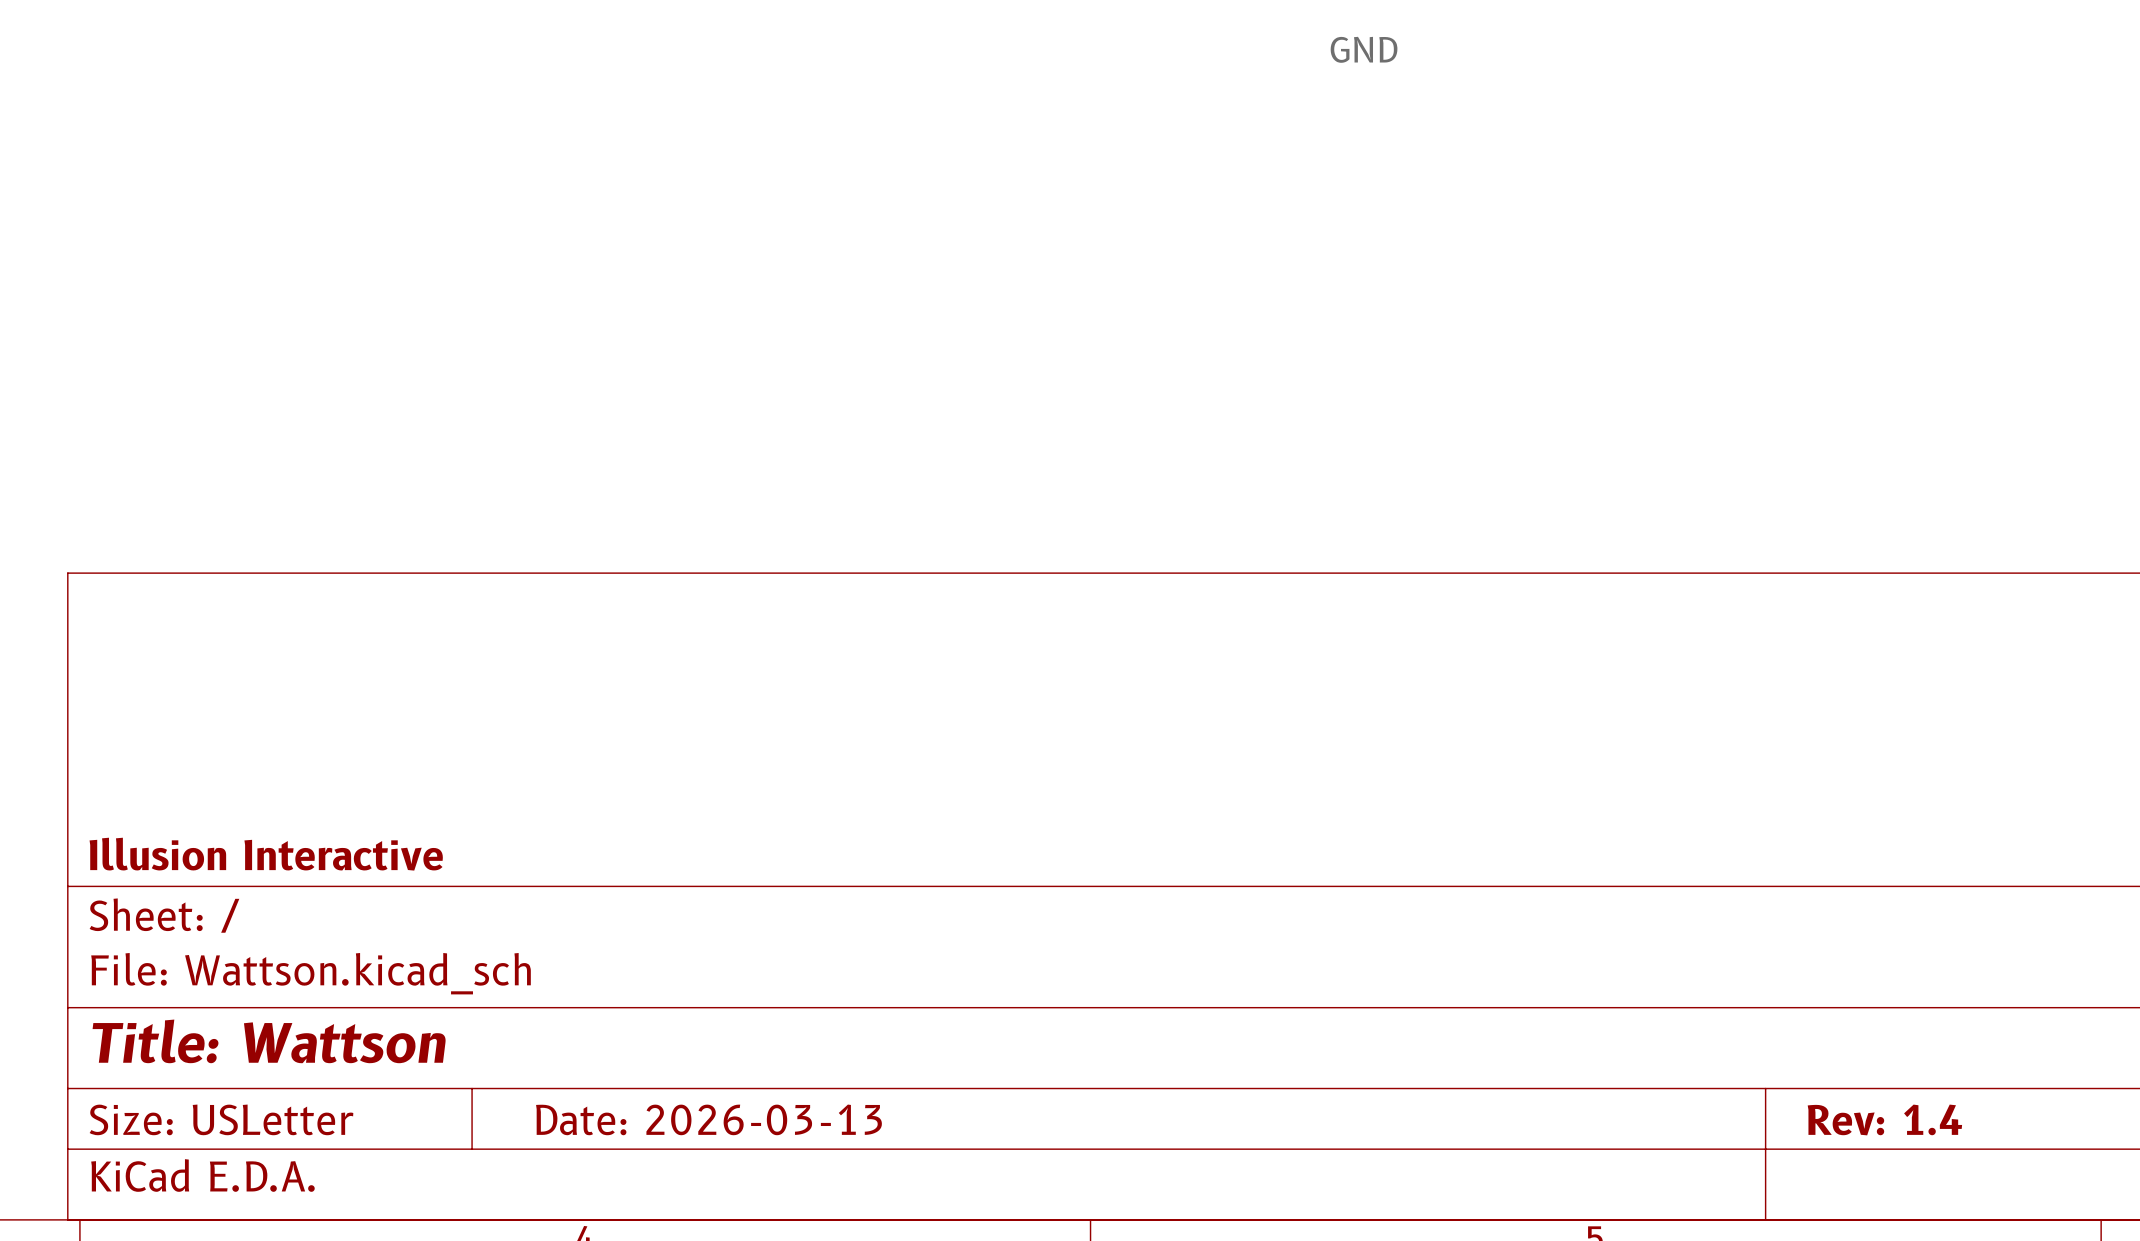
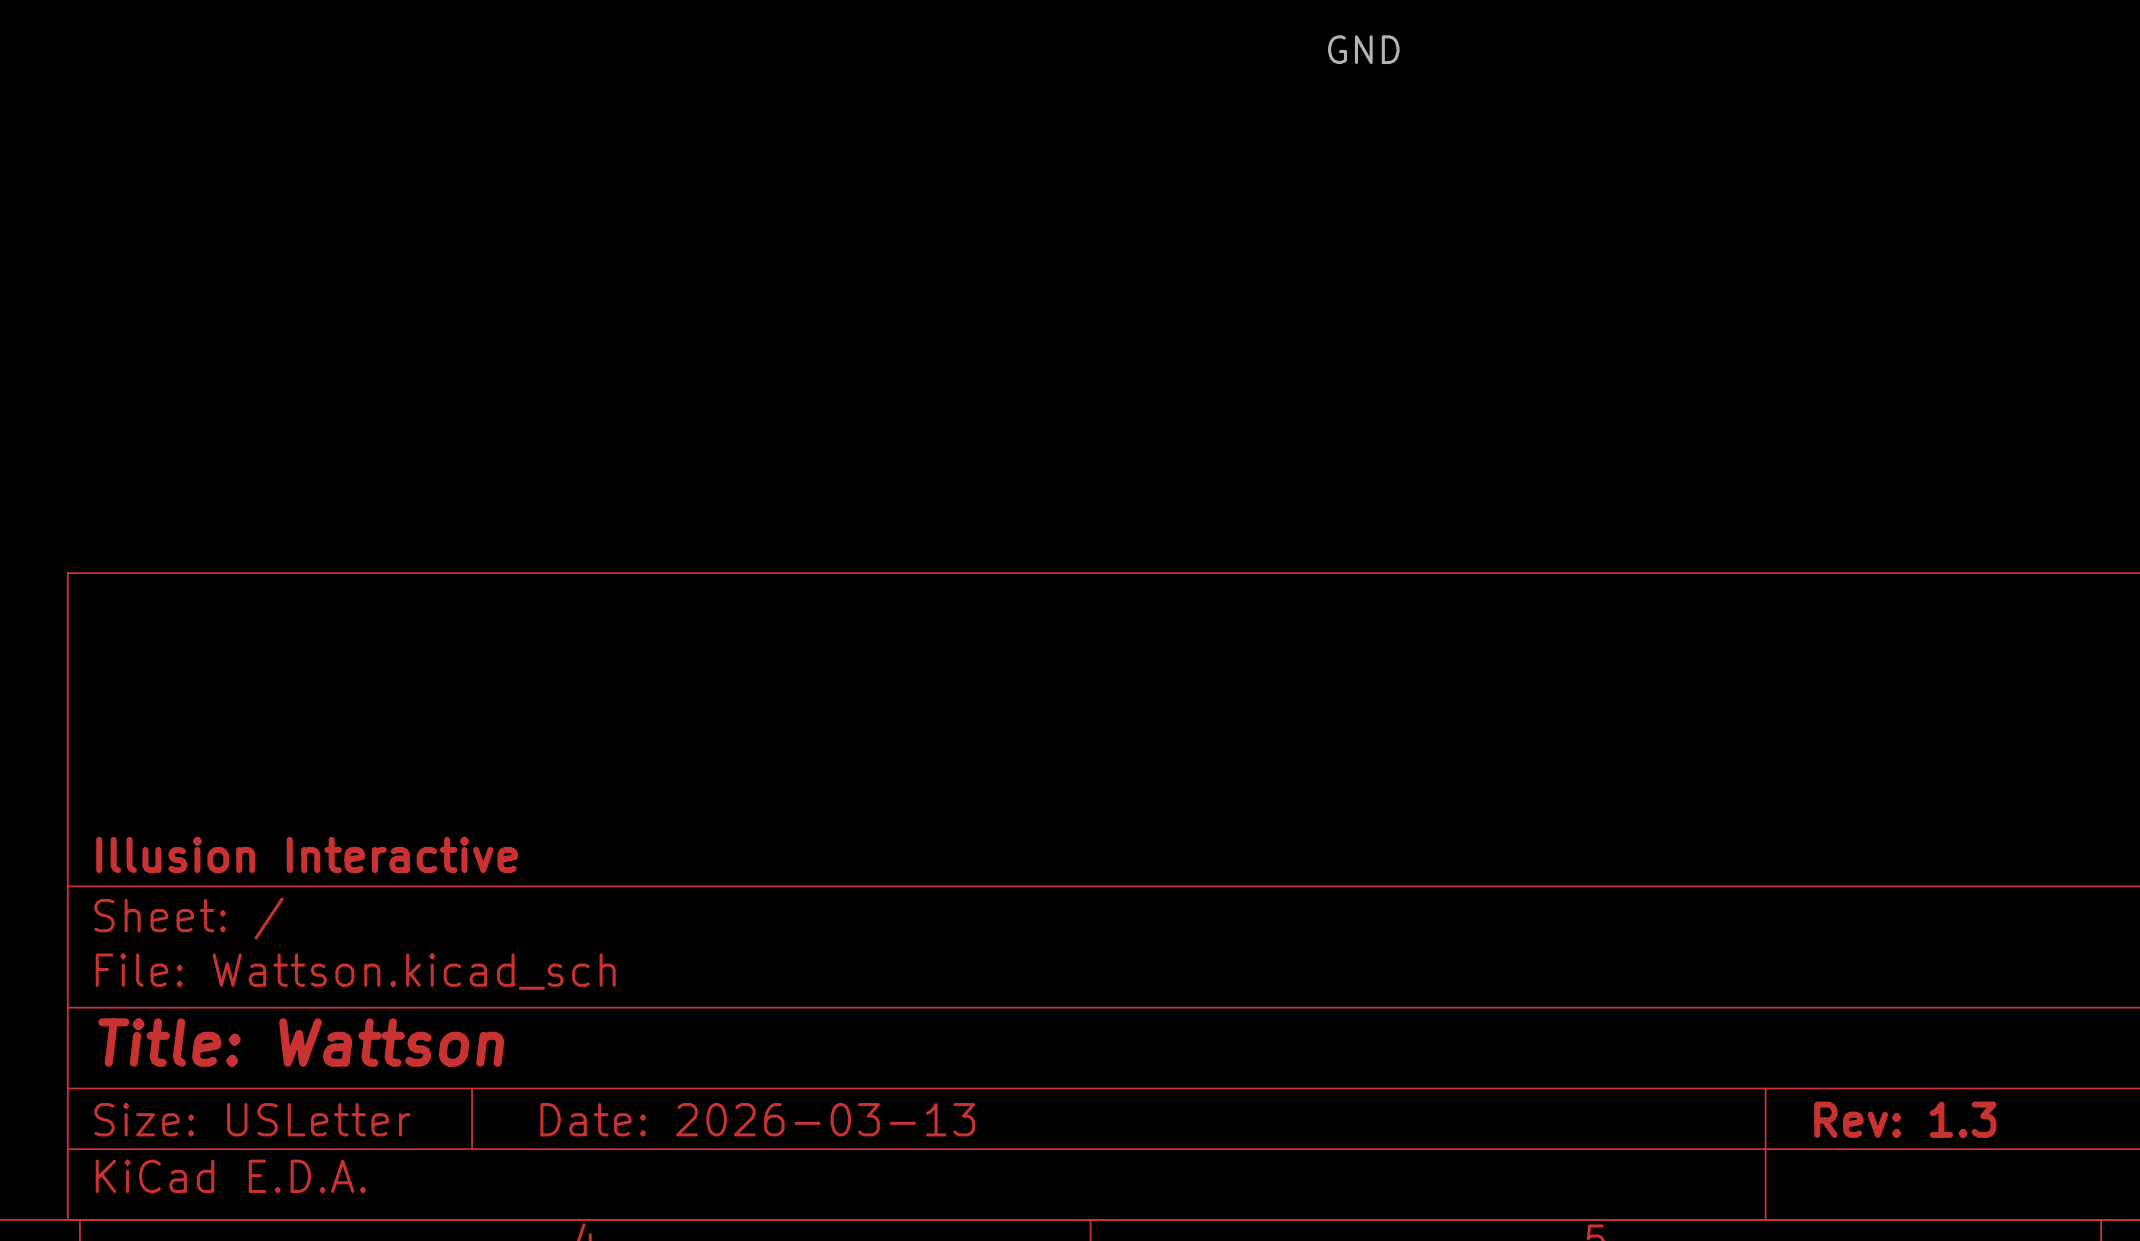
title block: Rev: 1.4 (1884, 1119) -> Rev: 1.3 (1905, 1119)

